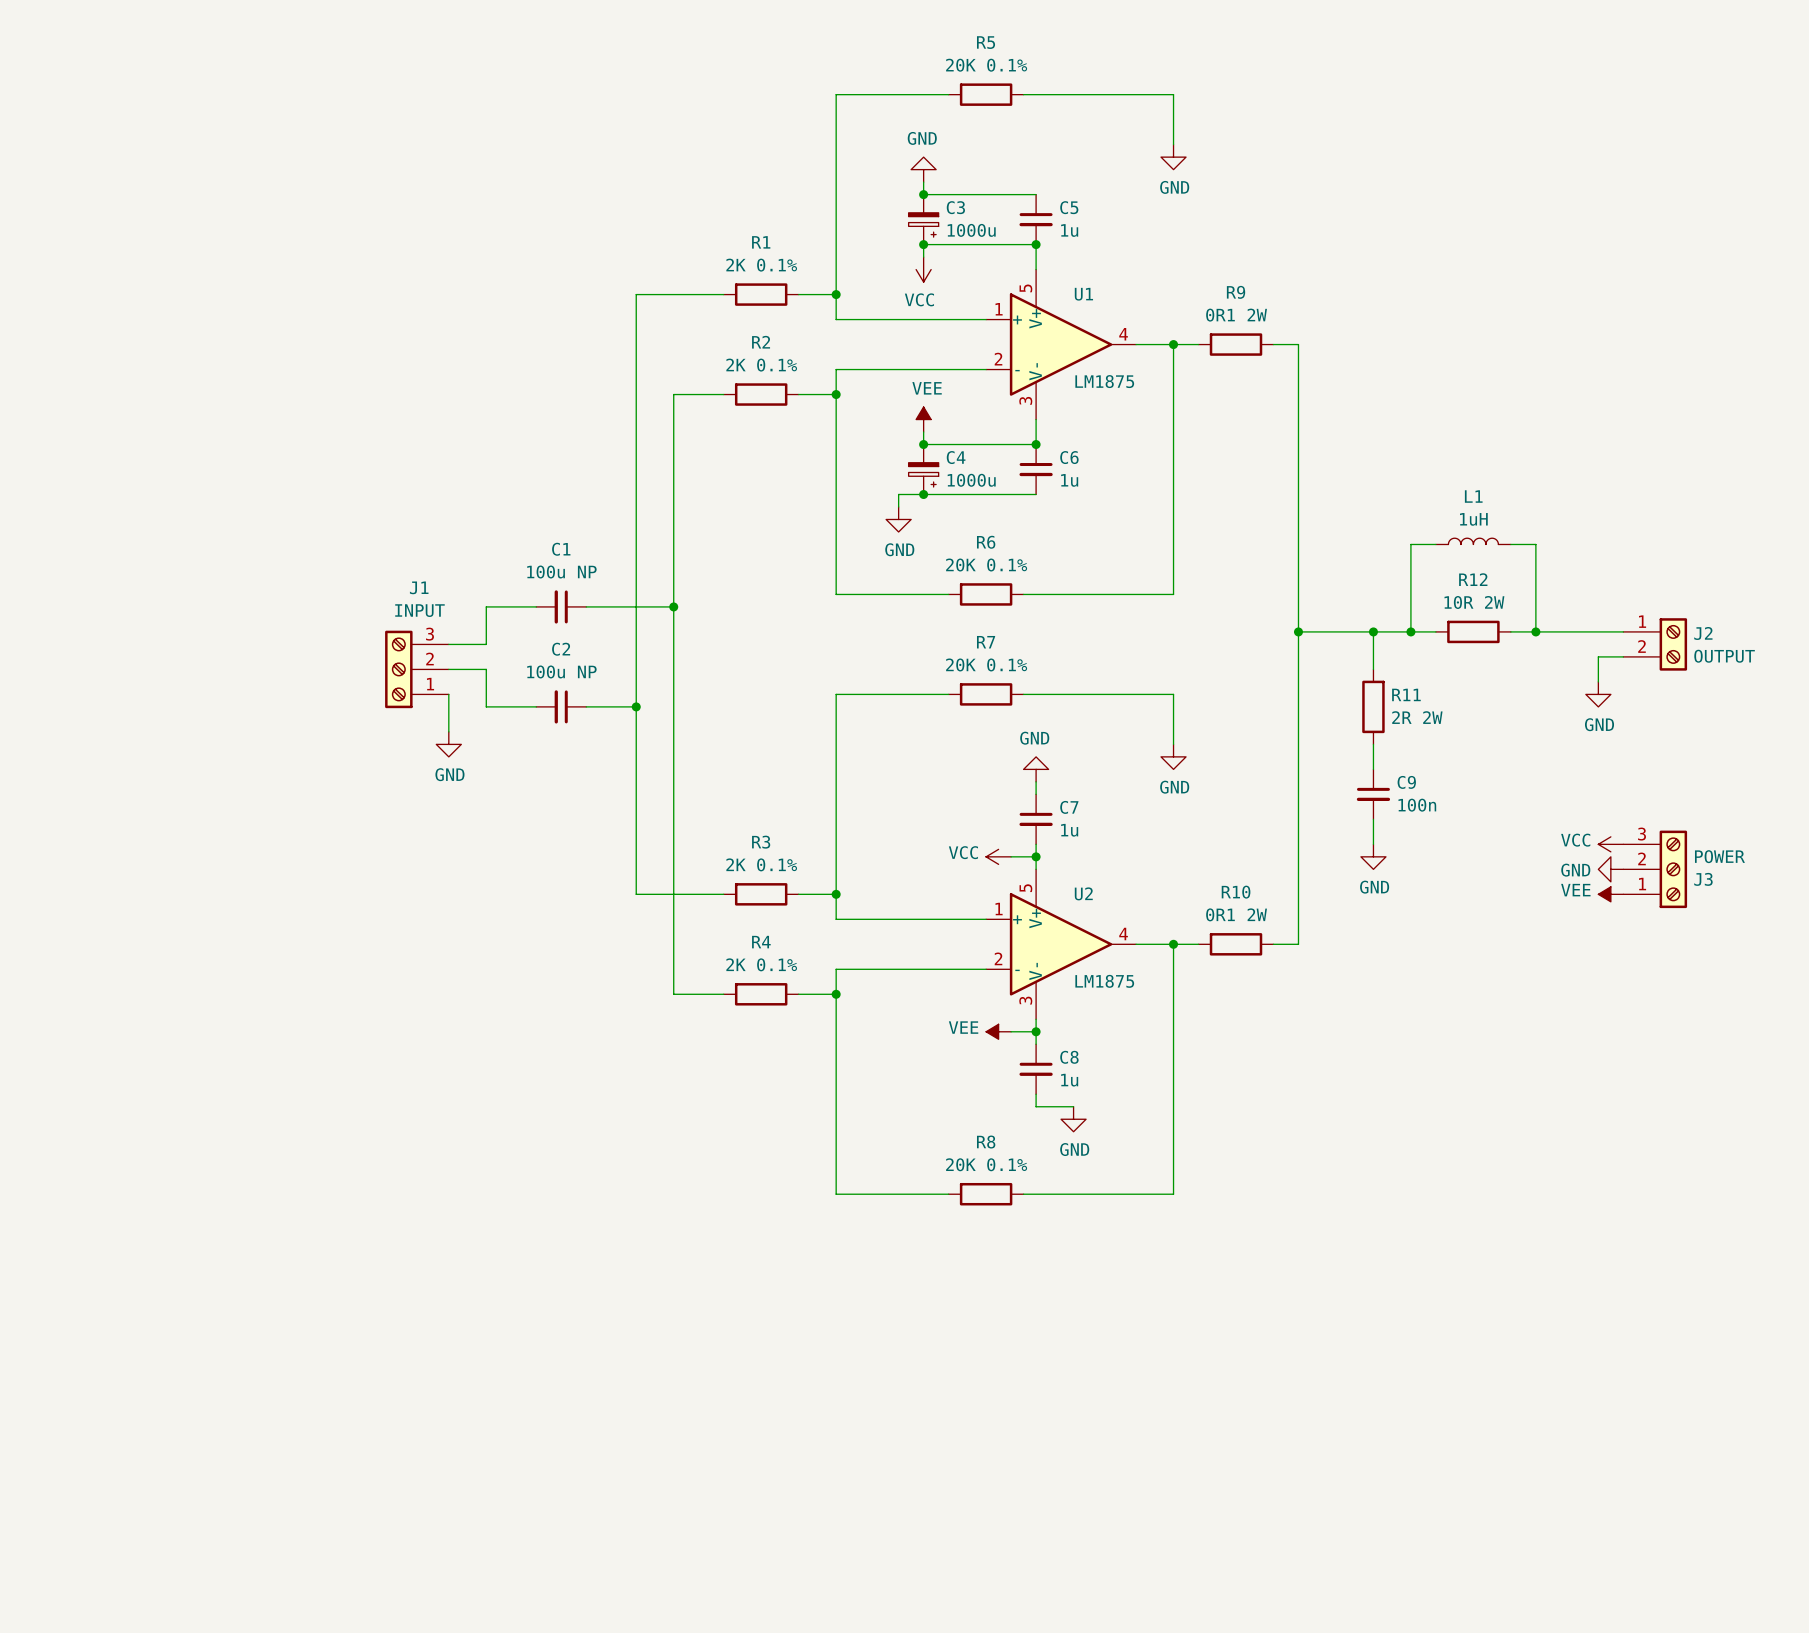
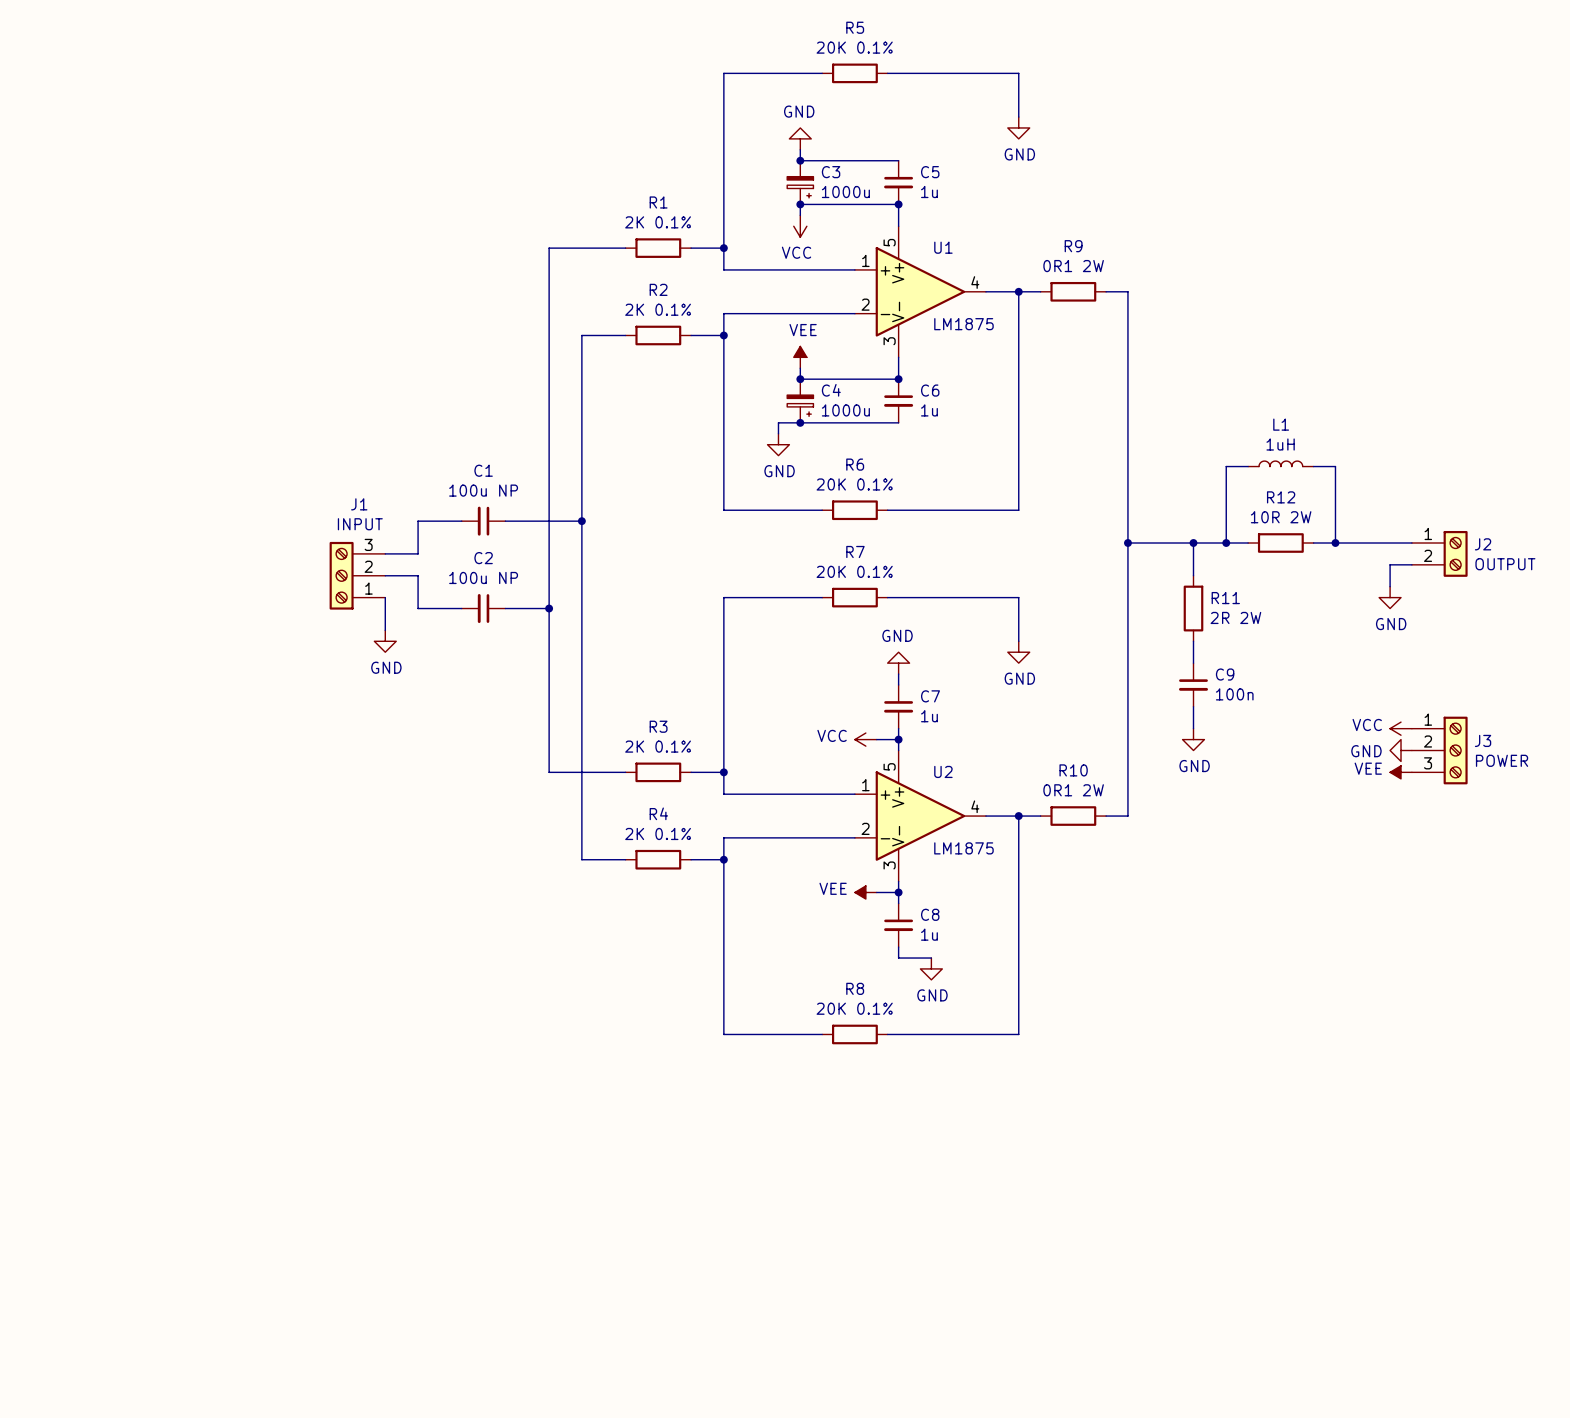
J3 flip: as is (1673, 869) -> up-down (1455, 750)

